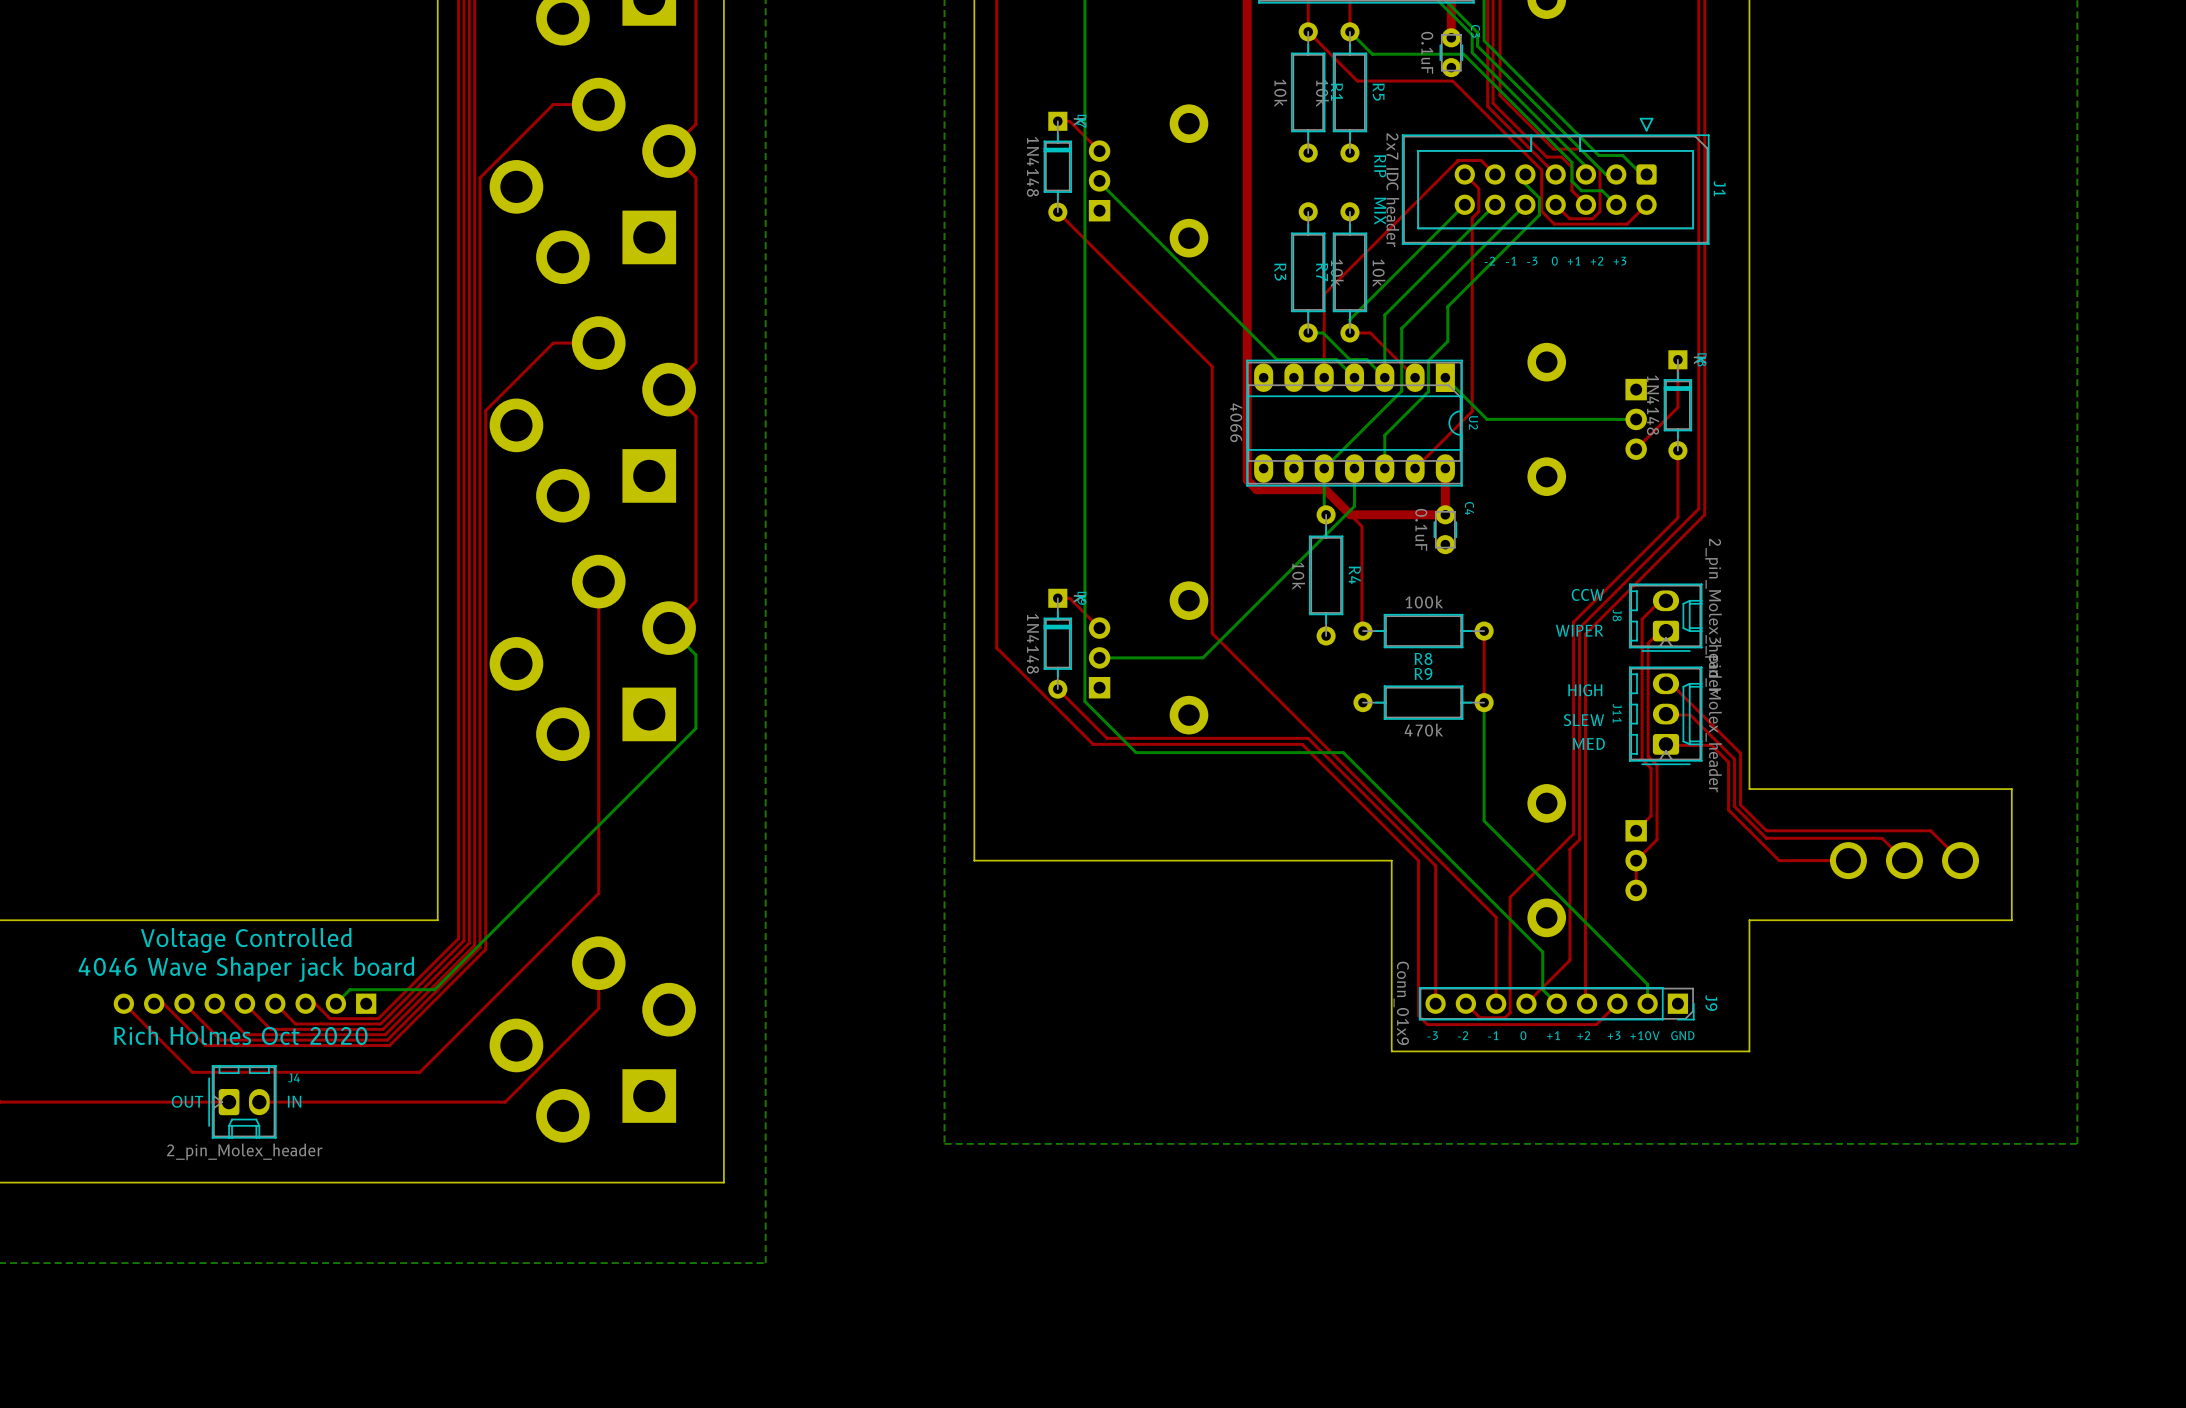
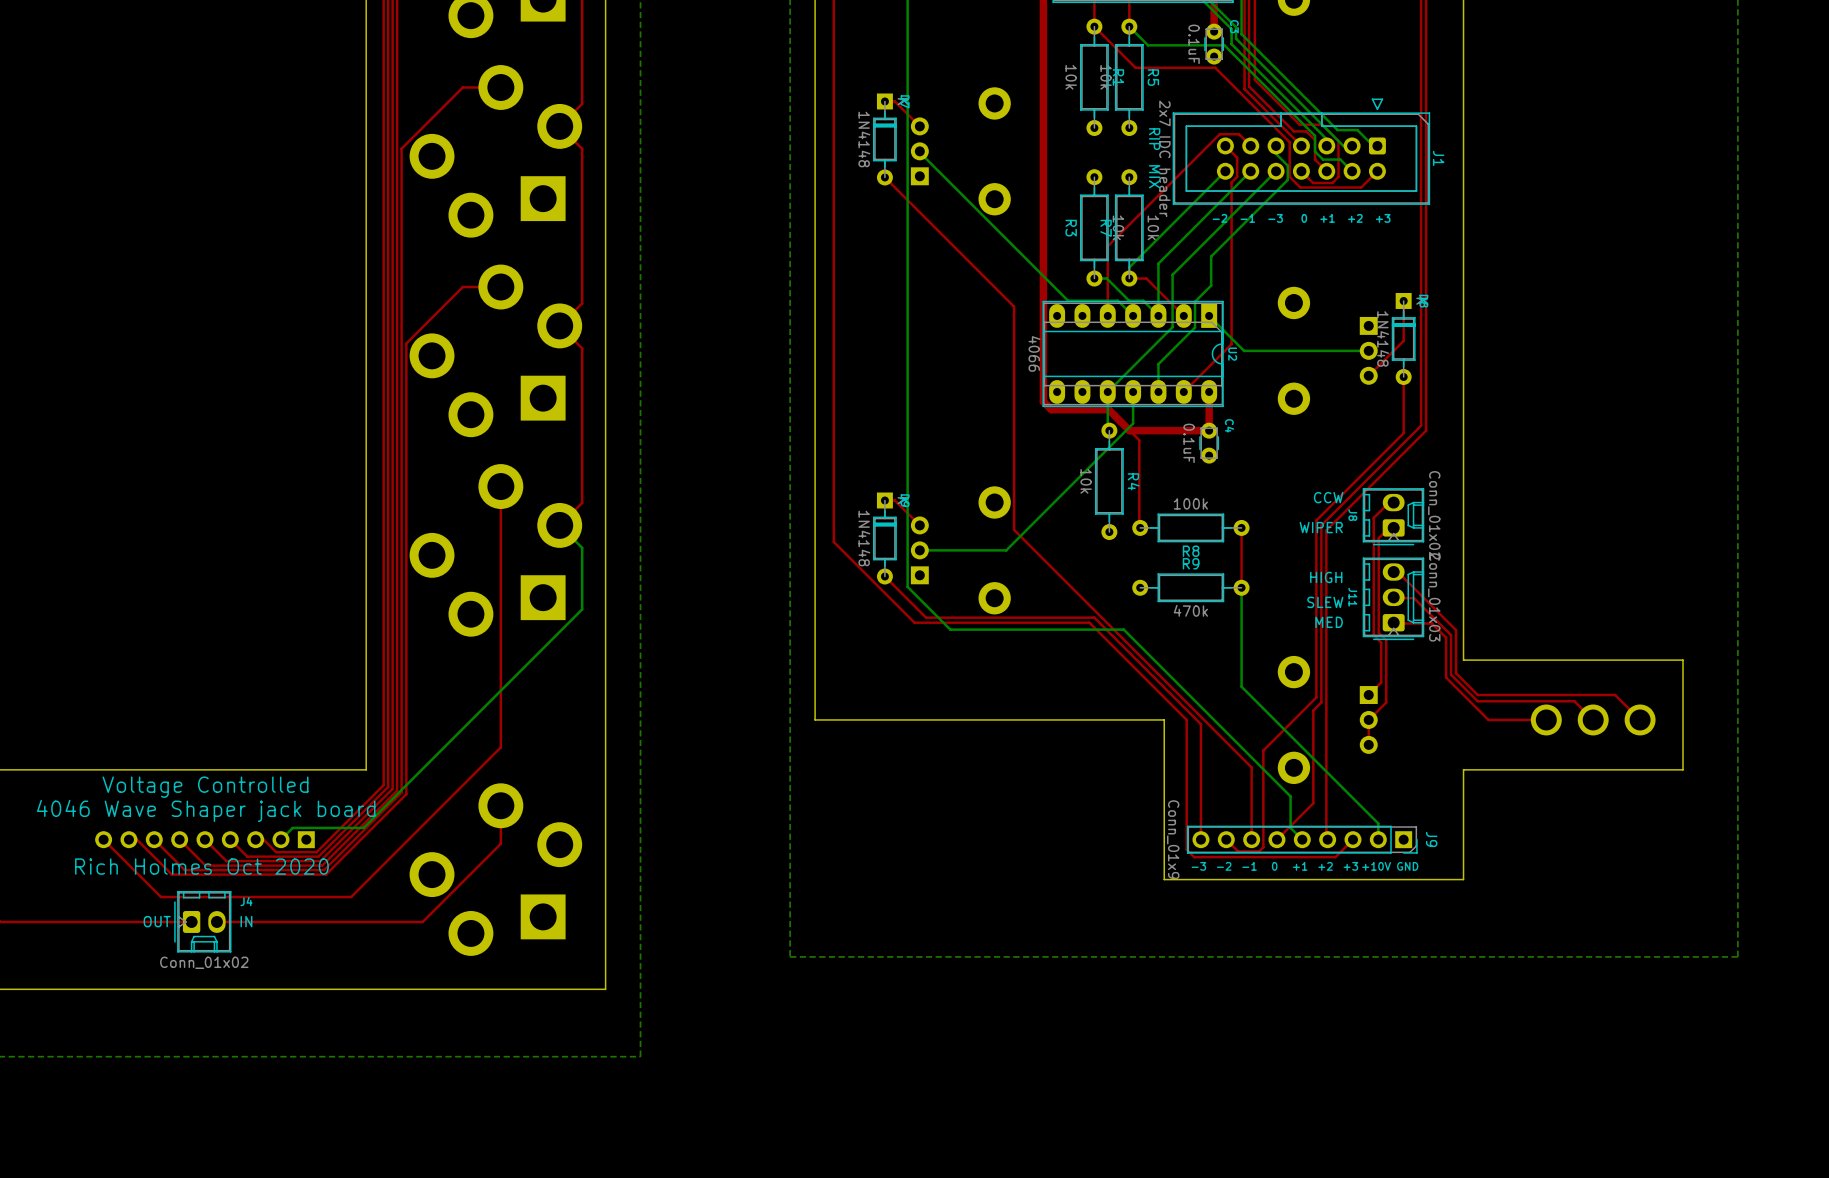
J8 value: 2_pin_Molex_header (1713, 616) -> Conn_01x02 (1434, 515)
J11 value: 3_pin_Molex_header (1713, 714) -> Conn_01x03 (1434, 597)
J4 value: 2_pin_Molex_header (244, 1151) -> Conn_01x02 (204, 962)

